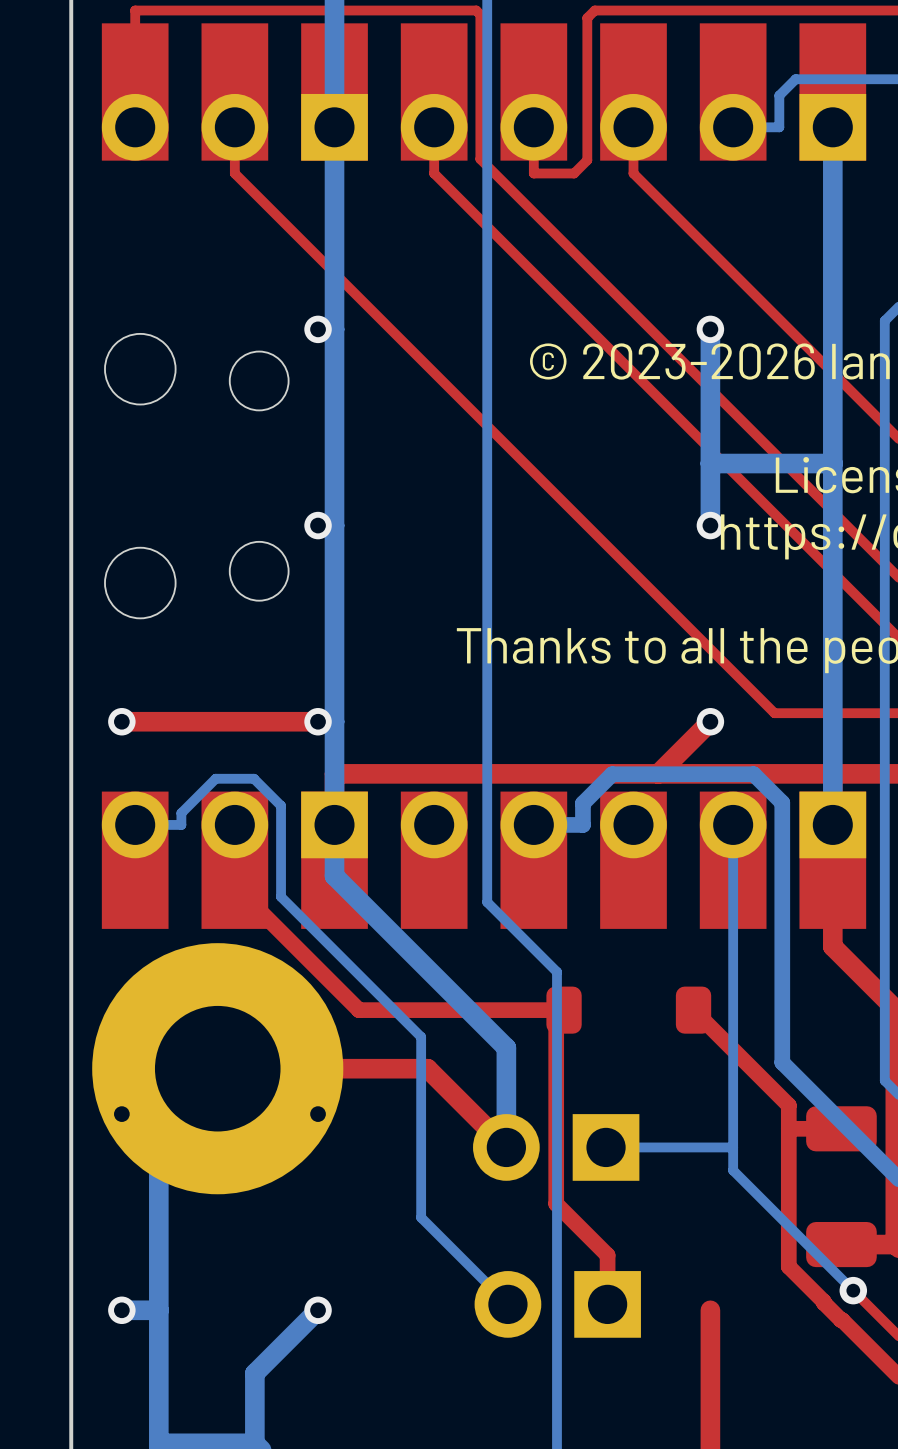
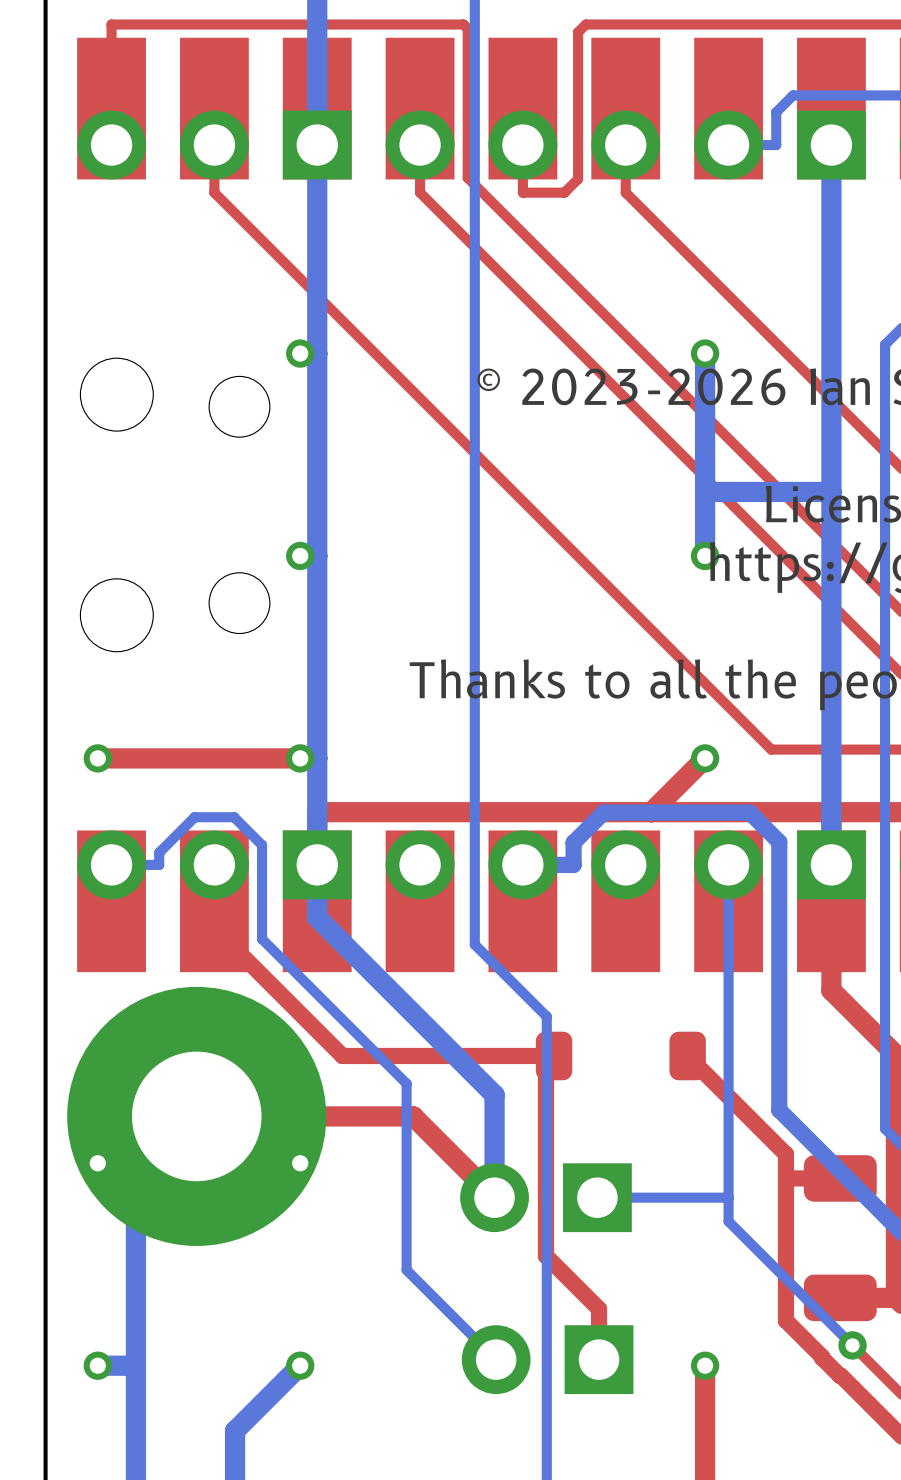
via: none -> (705, 1365)

